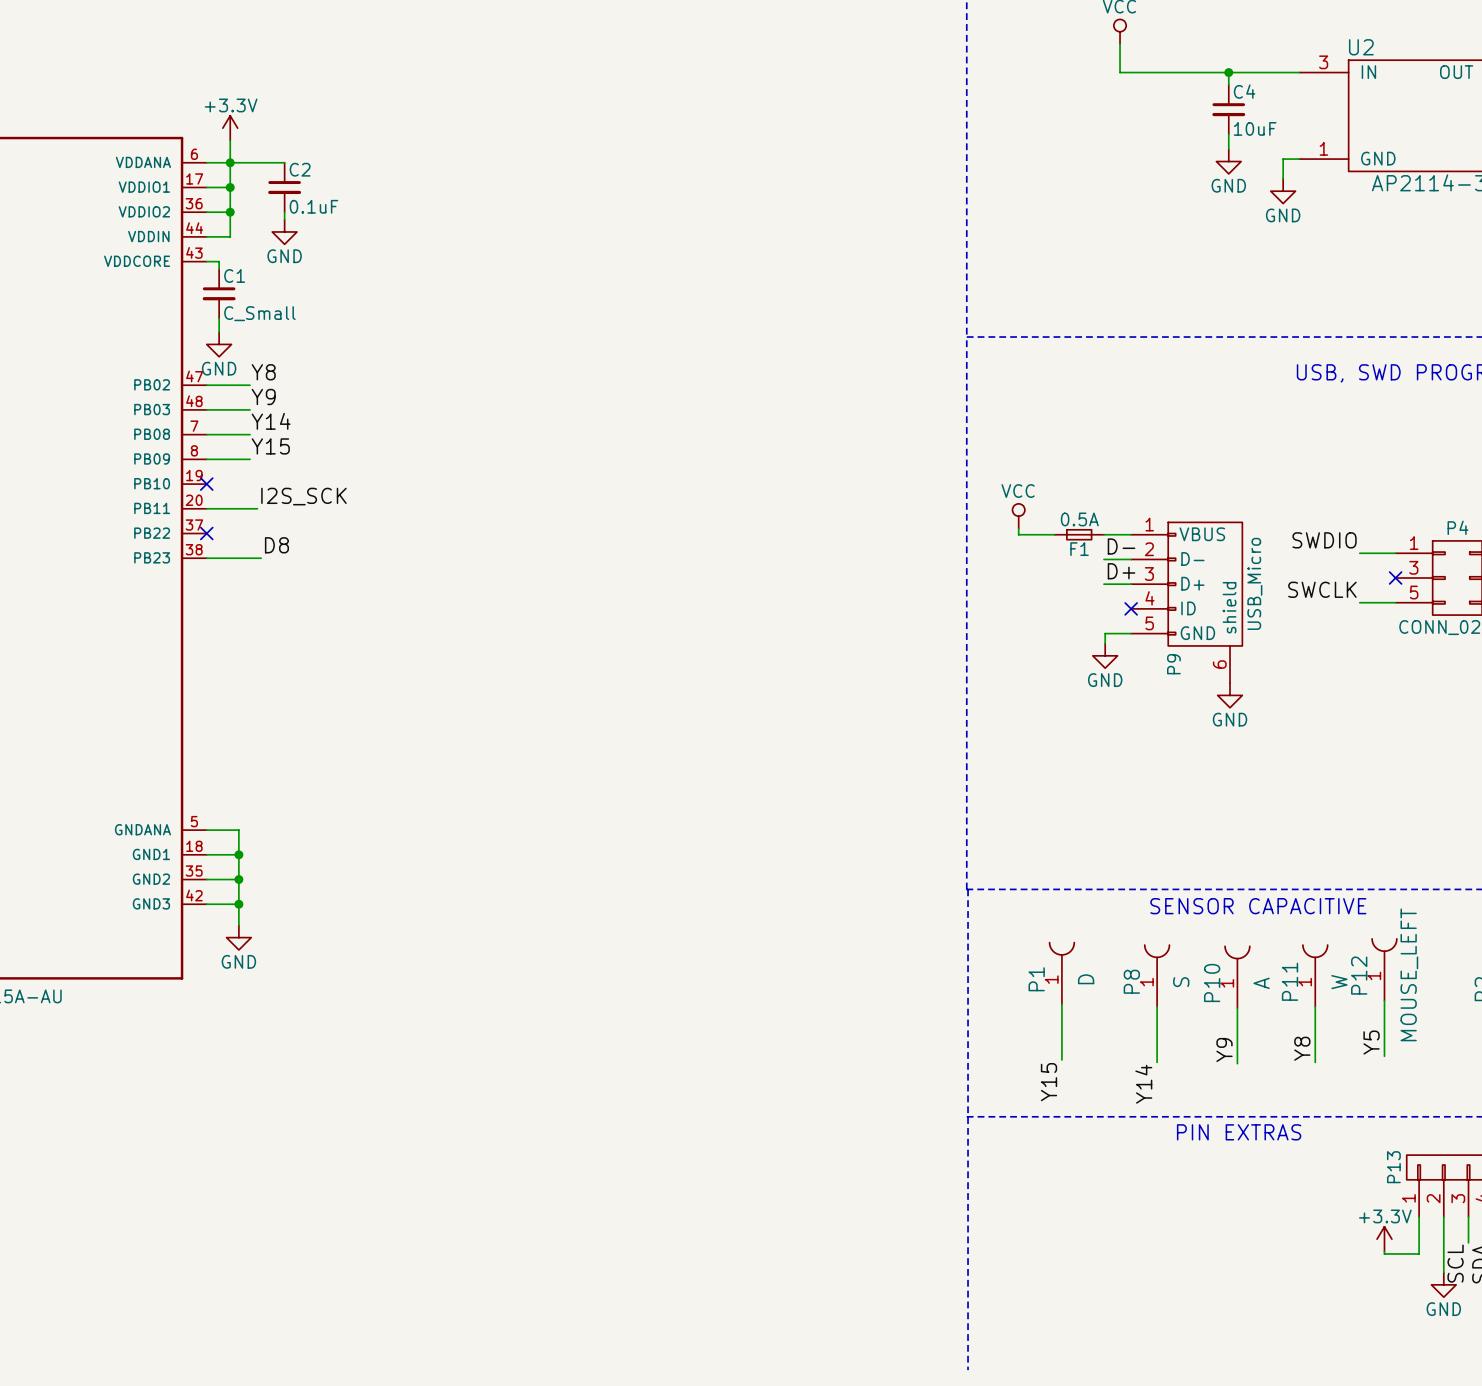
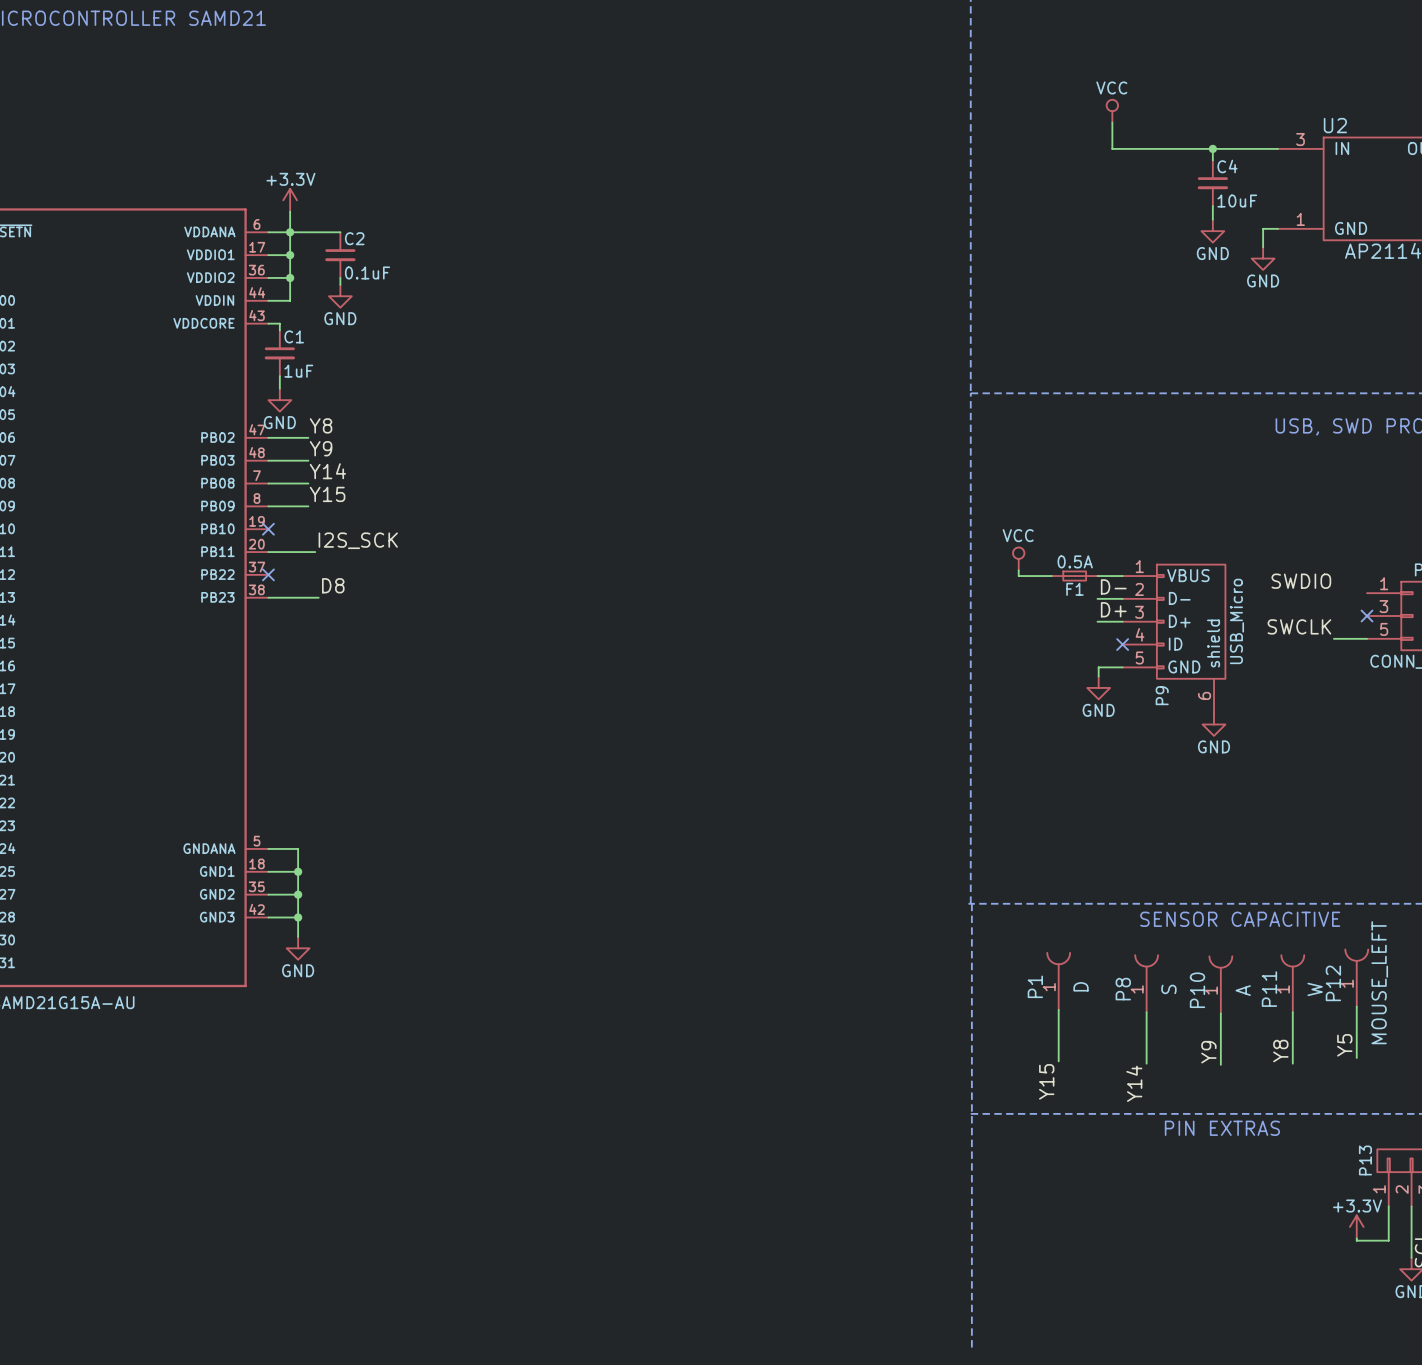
C1 value: C_Small (259, 313) -> 1uF (298, 371)
wire: (1359, 553) (1395, 553) -> none

